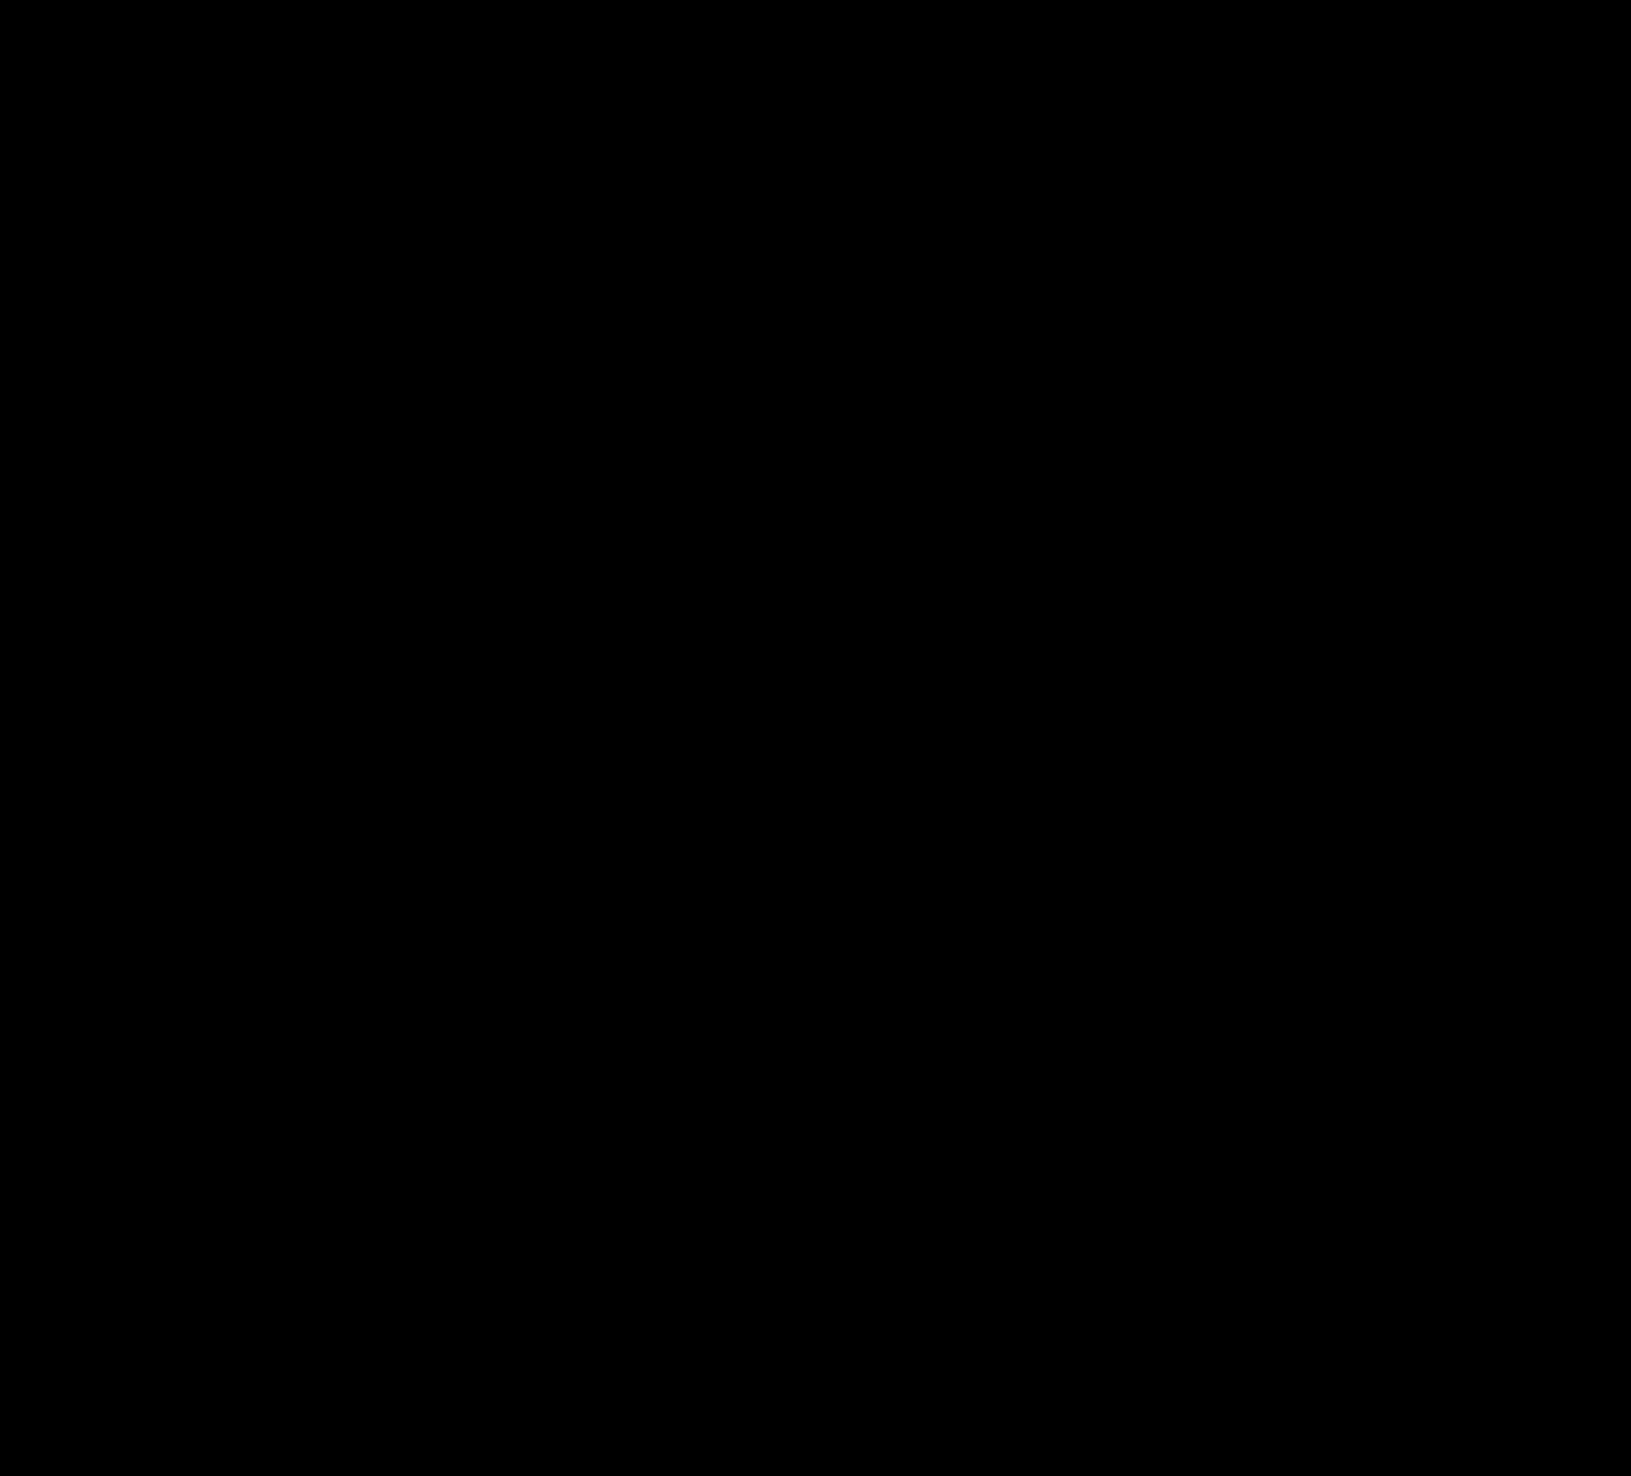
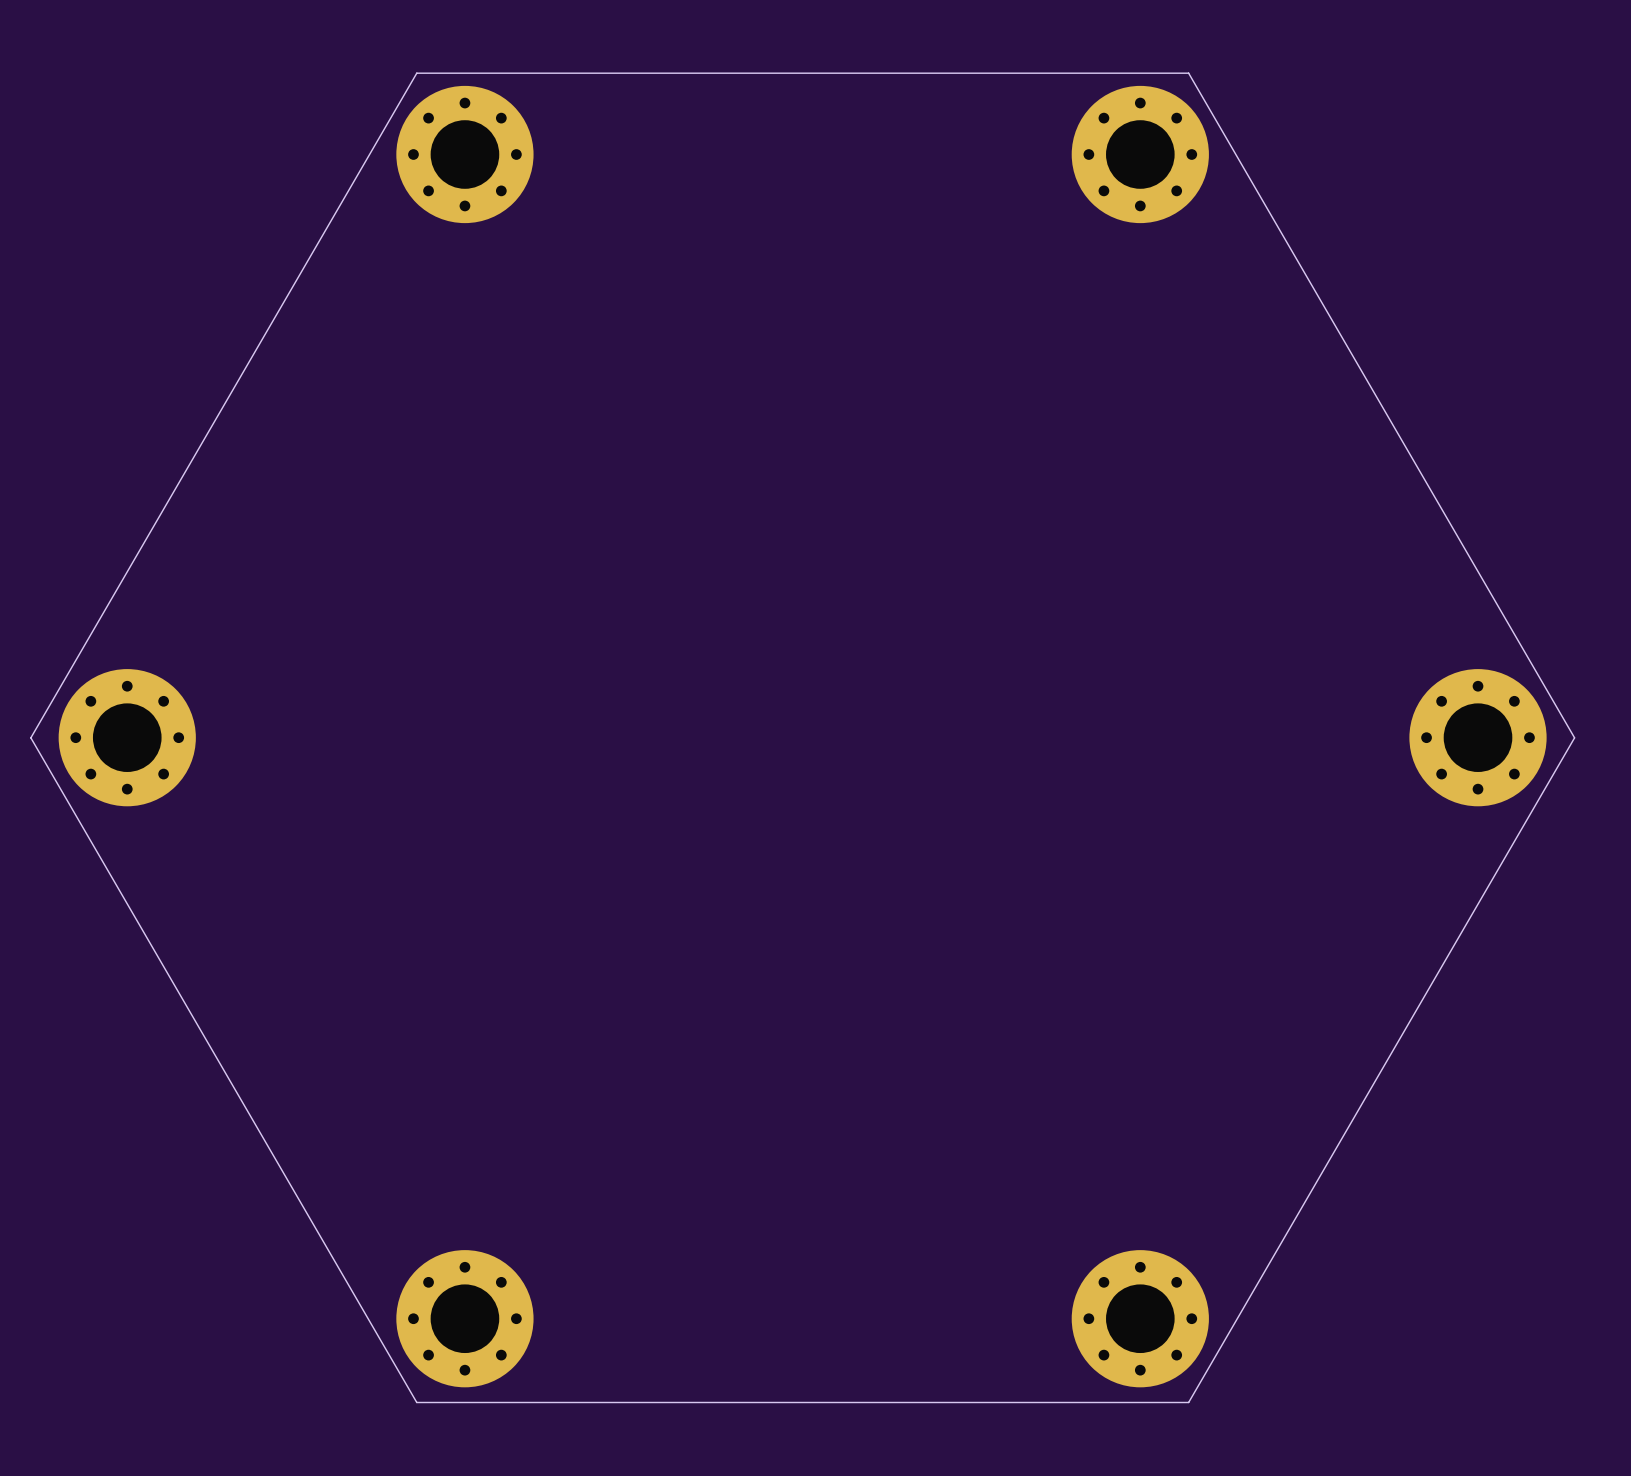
board edge: none -> (1188, 73) (416, 73) (30, 737) (416, 1402) (1188, 1402) (1574, 737) (1188, 73)
part: none -> (464, 154)
part: none -> (1140, 154)
part: none -> (127, 737)
part: none -> (1478, 737)
part: none -> (464, 1318)
part: none -> (1140, 1318)

